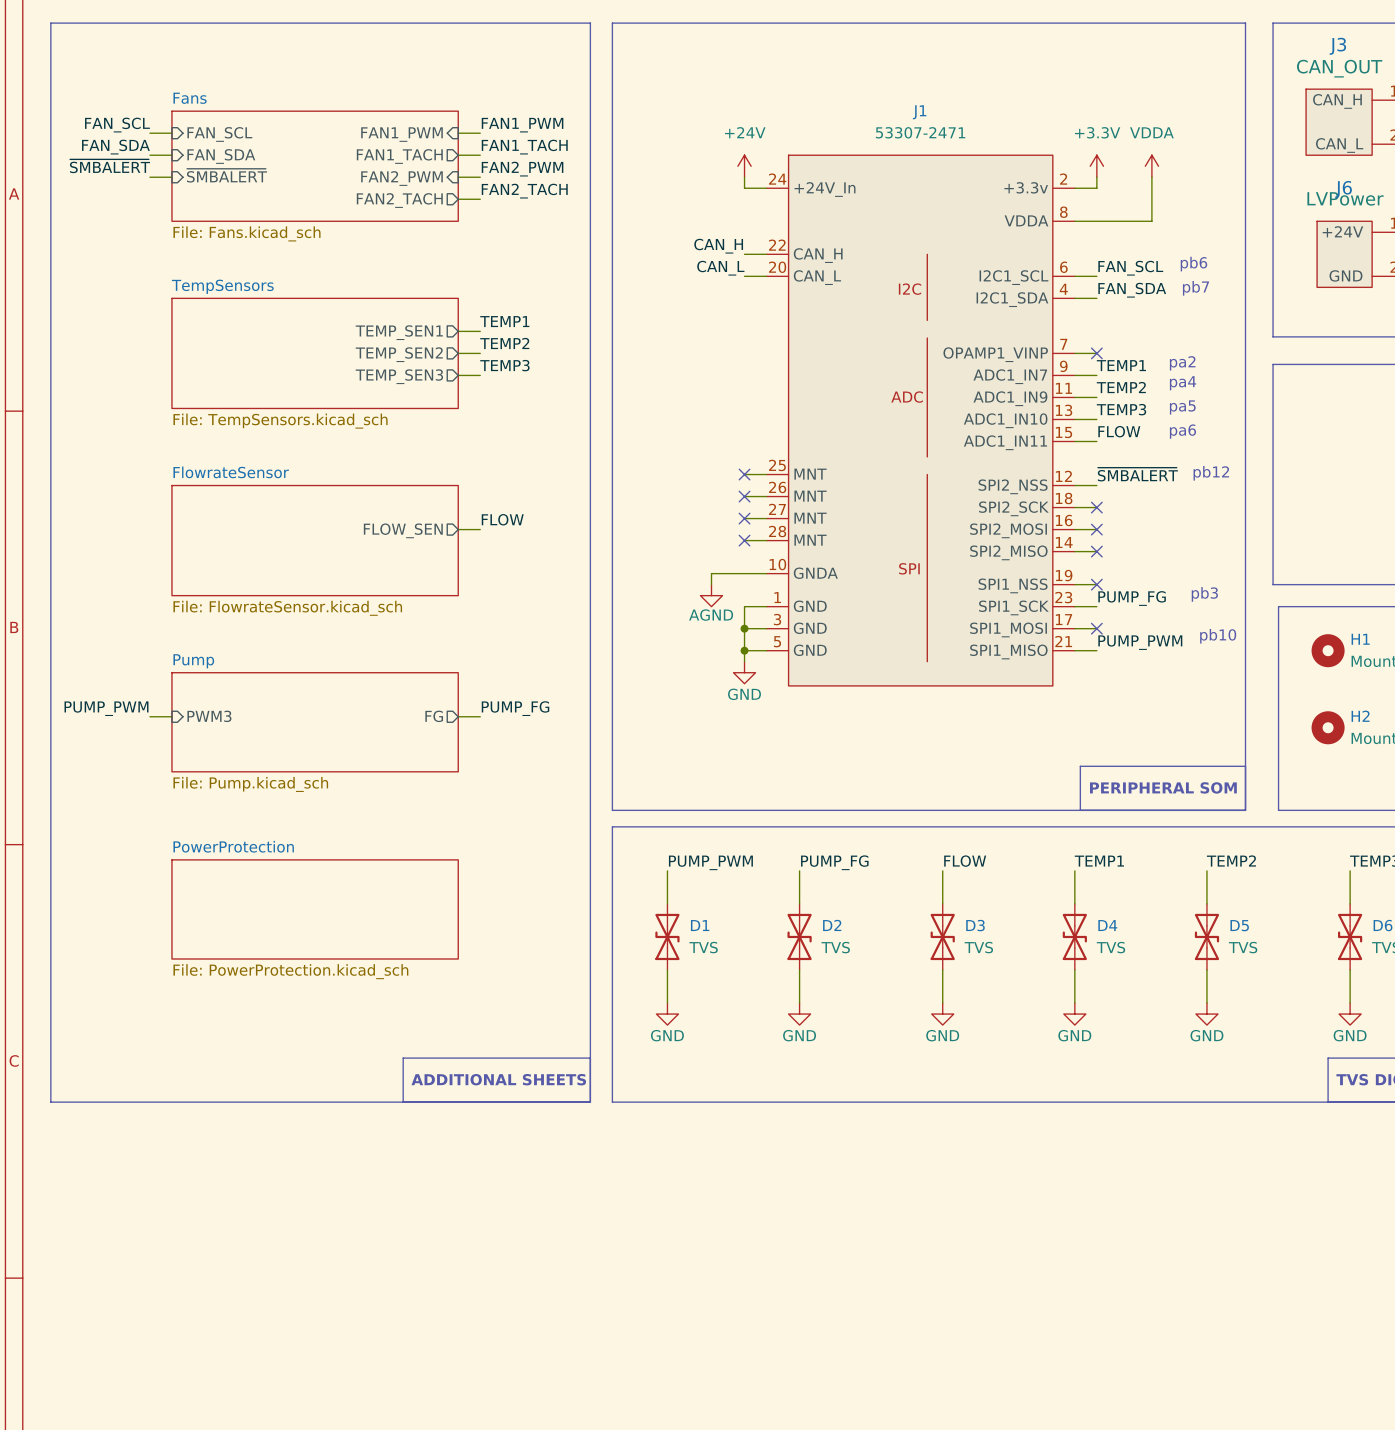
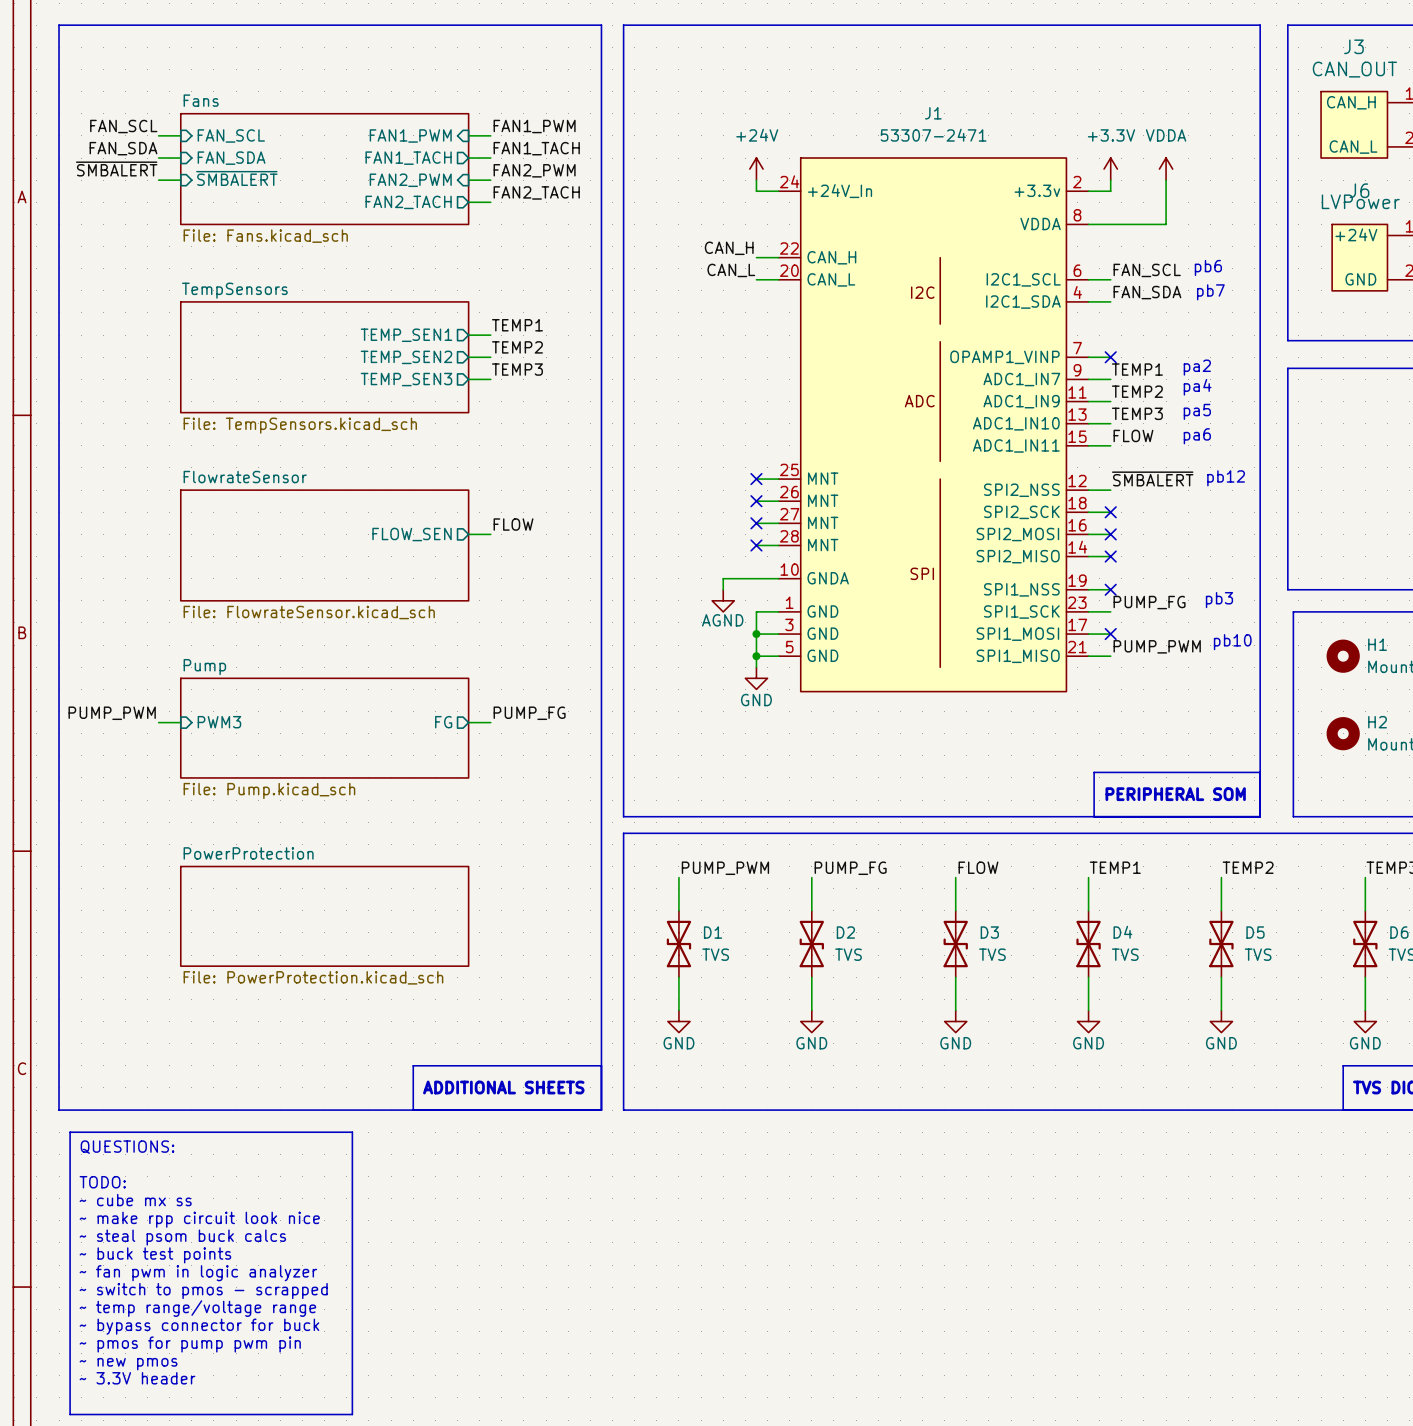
line: none -> (70, 1132) (352, 1132) (352, 1414) (70, 1414) (70, 1132)
text: none -> QUESTIONS: (127, 1147)
text: none -> TODO: (102, 1182)
text: none -> ~ cube mx ss (135, 1200)
text: none -> ~ make rpp circuit look nice (199, 1219)
text: none -> ~ steal psom buck calcs (182, 1237)
text: none -> ~ buck test points (155, 1255)
text: none -> ~ fan pwm in logic analyzer (198, 1273)
text: none -> ~ switch to pmos - scrapped (203, 1291)
text: none -> ~ temp range/voltage range (197, 1308)
text: none -> ~ bypass connector for buck (199, 1326)
text: none -> ~ pmos for pump pwm pin (190, 1344)
text: none -> ~ new pmos (128, 1364)
text: none -> ~ 3.3V header (137, 1378)

